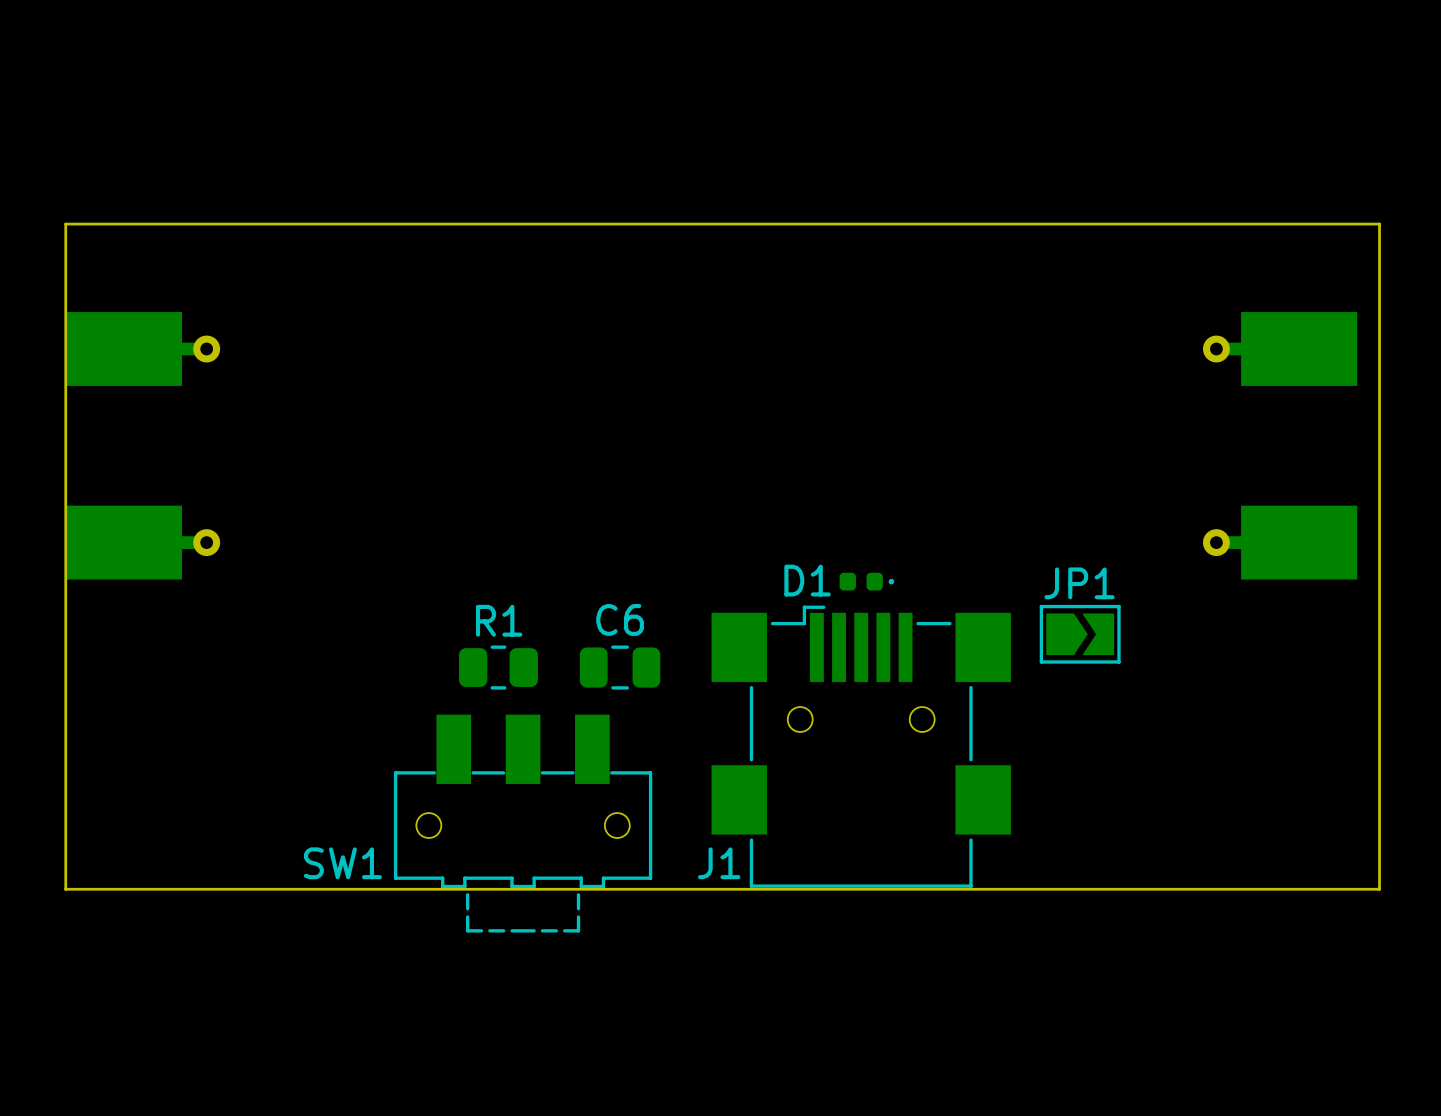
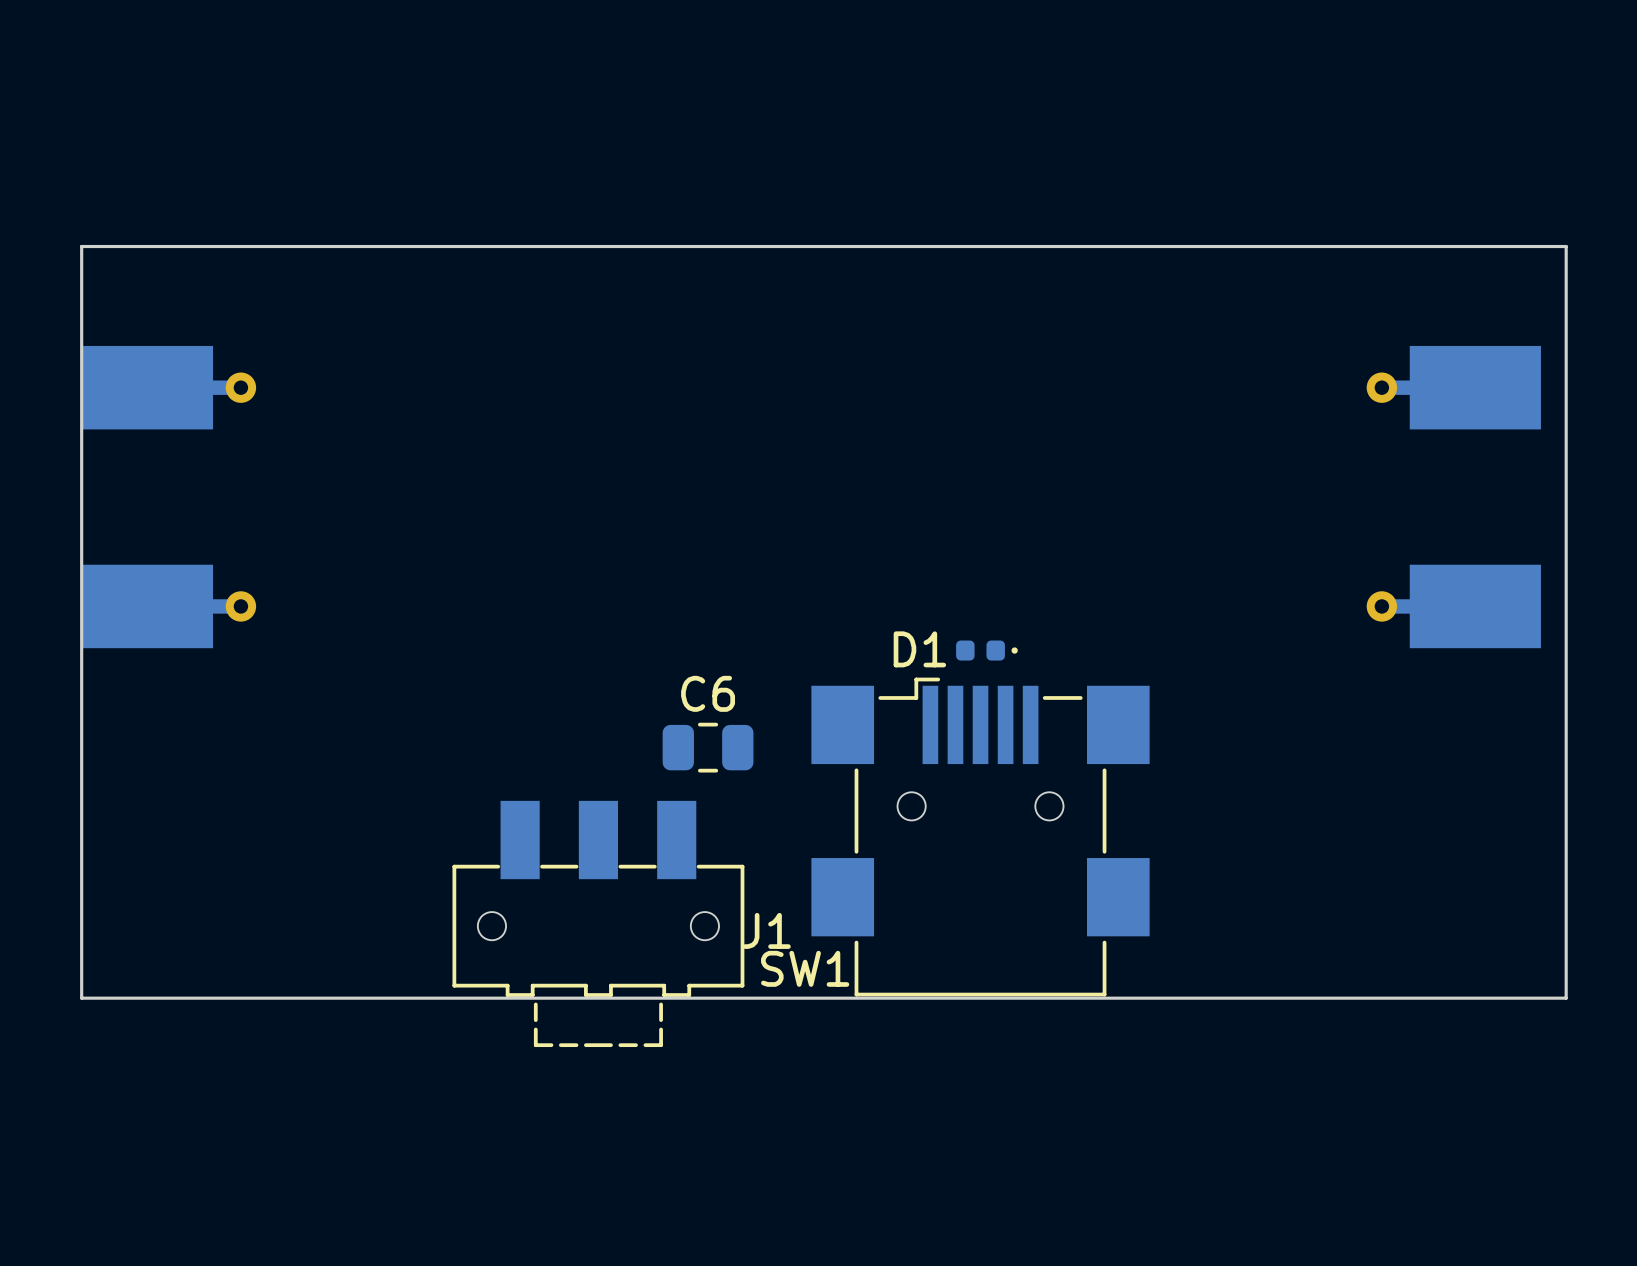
JP1: (1080, 634) -> none
R1: (498, 667) -> none
SW1 name position: SW1 (342, 863) -> SW1 (805, 968)
J1 name position: J1 (719, 863) -> J1 (766, 930)

